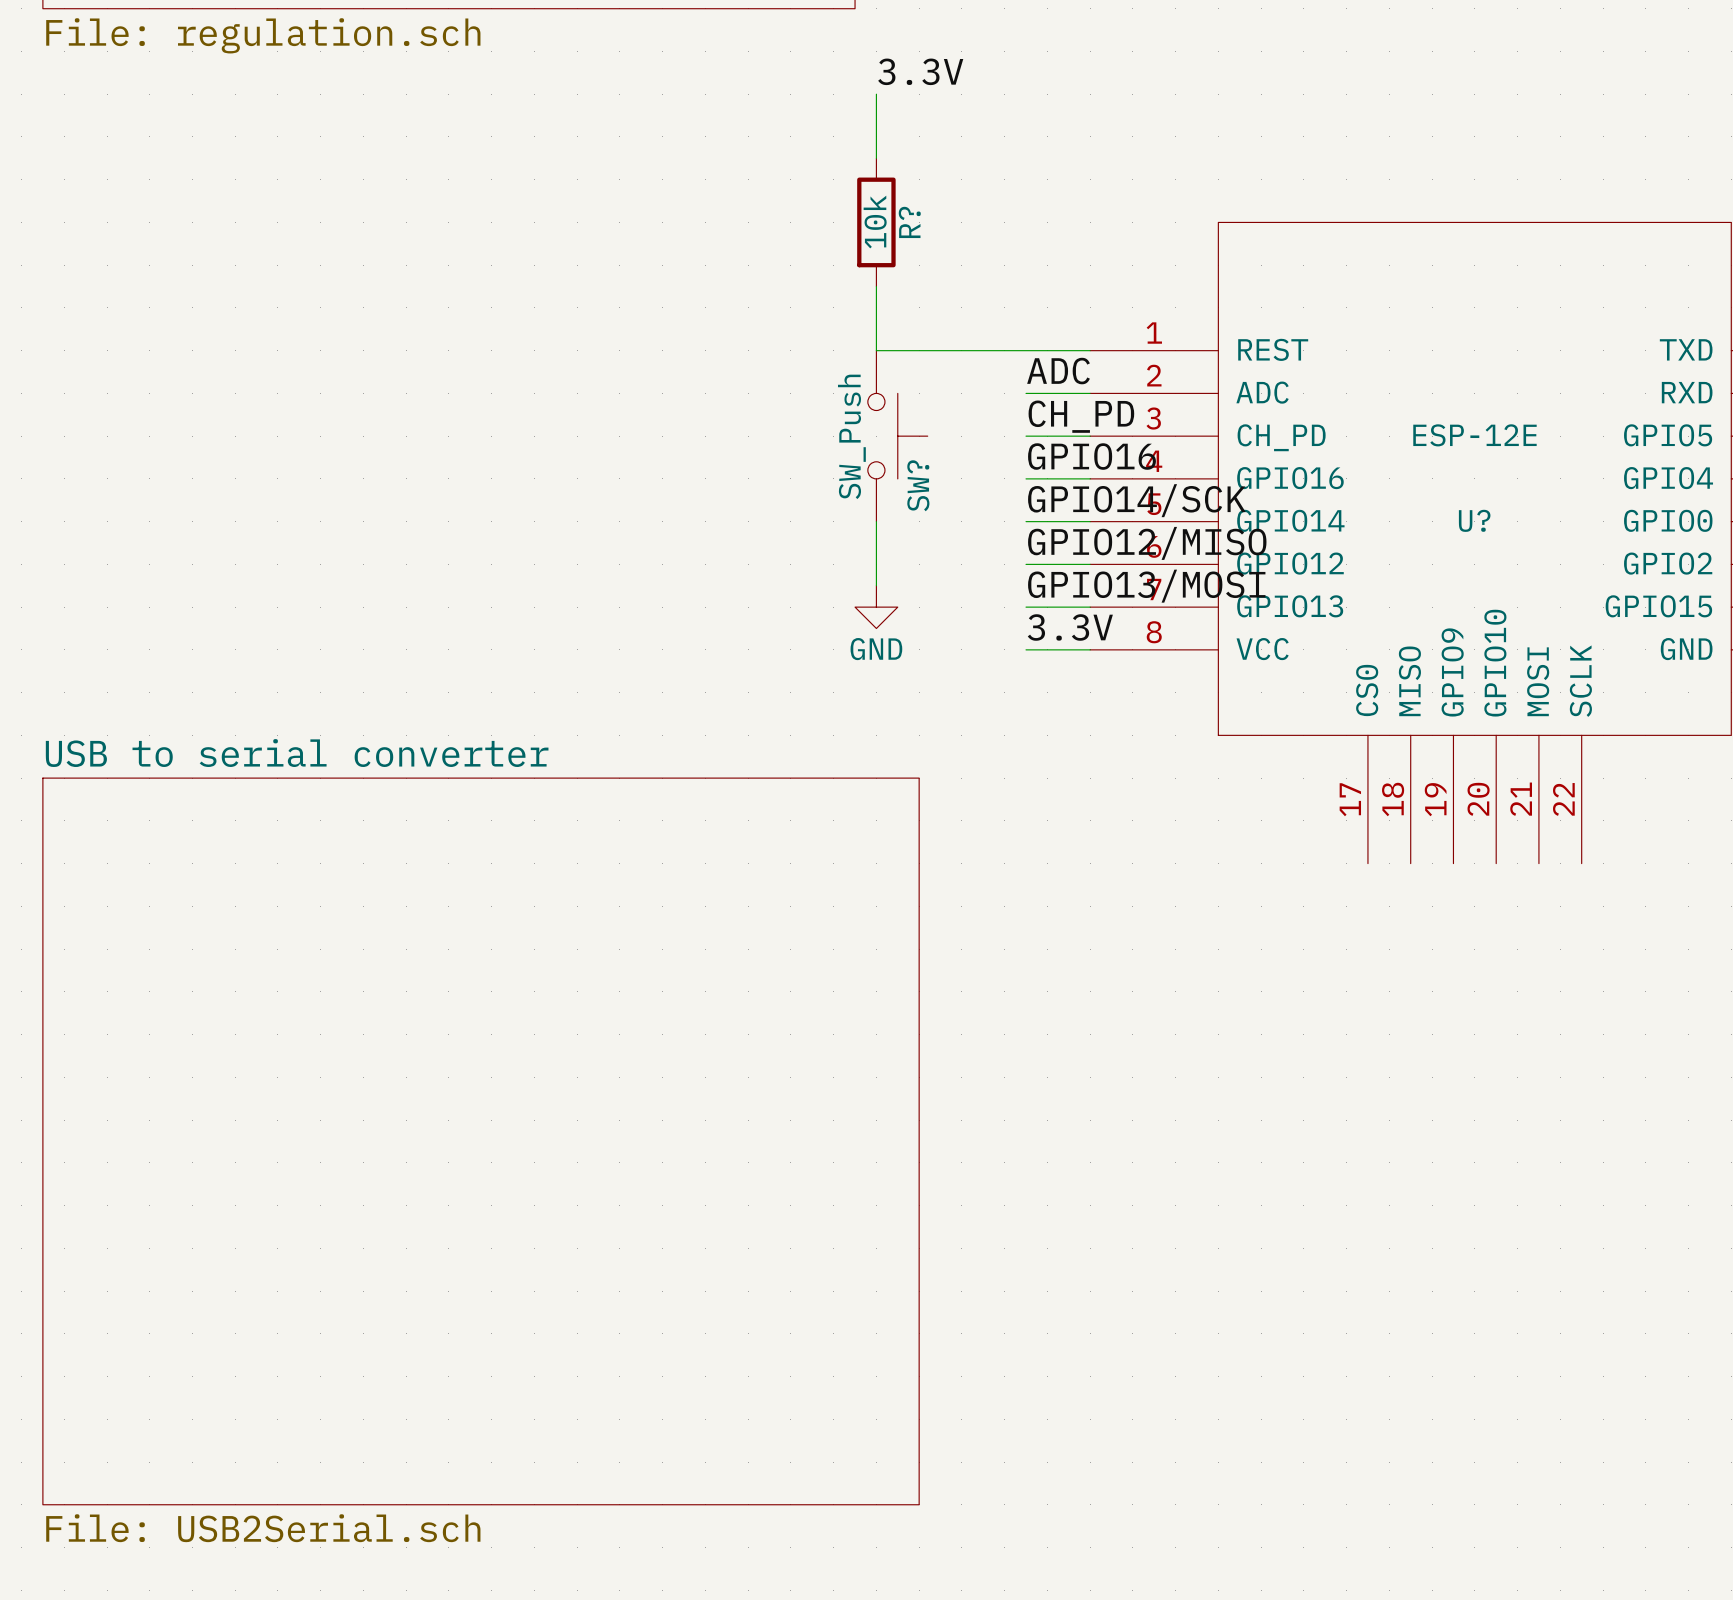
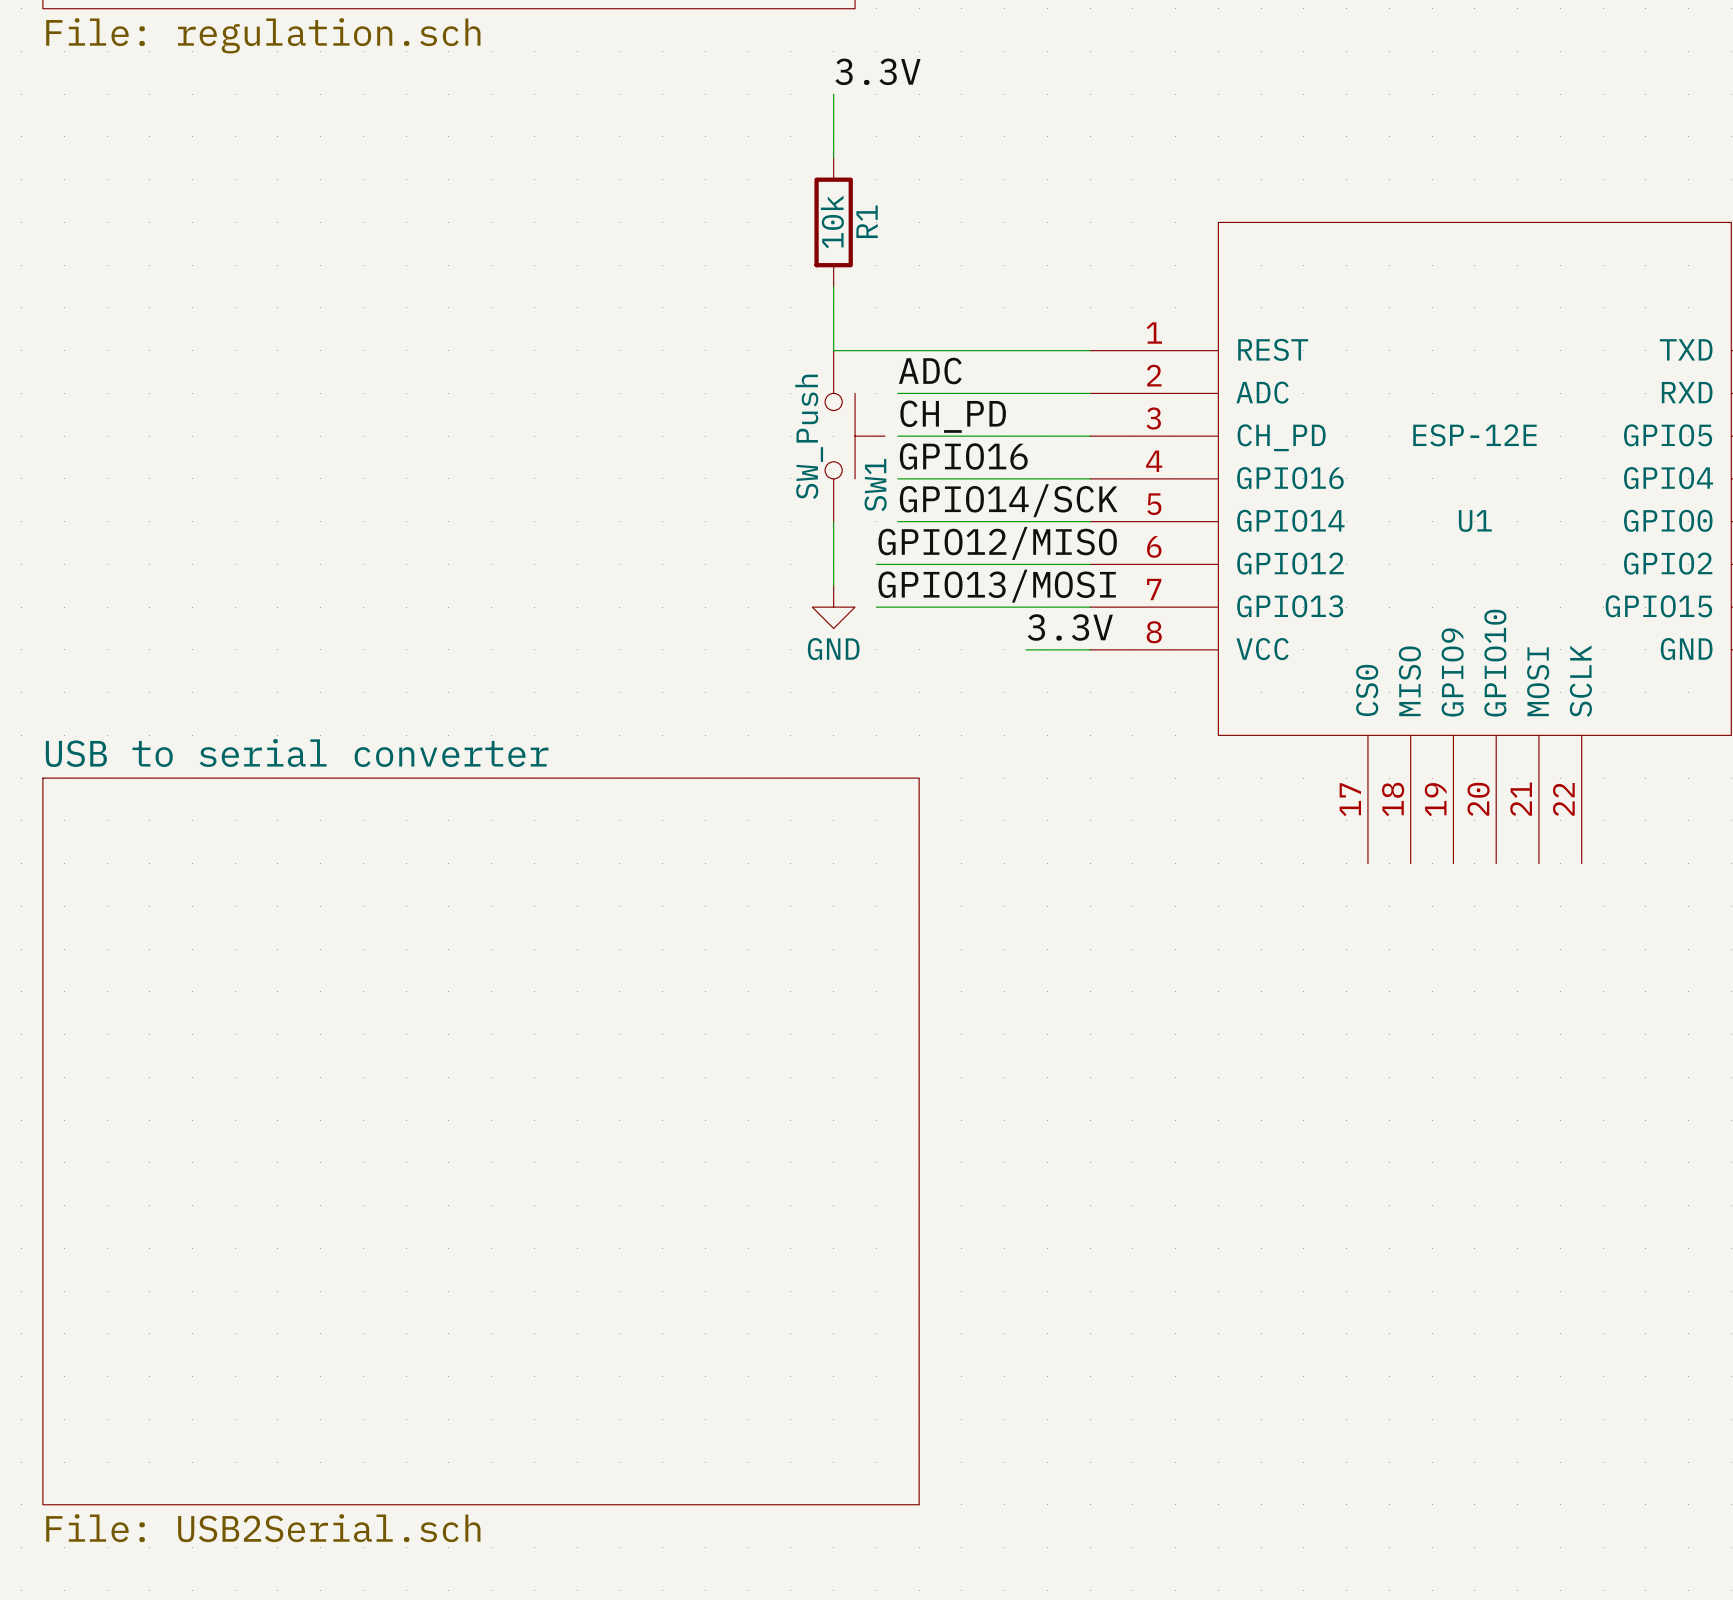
label position: 3.3V (920, 71) -> 3.3V (877, 71)
wire: (876, 94) (876, 158) -> (833, 94) (833, 158)
R1: none -> 10k (833, 222)
R?: 10k (876, 222) -> none
wire: (876, 286) (876, 350) -> (833, 286) (833, 350) (876, 350)
label position: ADC (1058, 371) -> ADC (930, 371)
wire: none -> (897, 393) (1026, 393)
label position: CH_PD (1081, 416) -> CH_PD (953, 416)
SW1: none -> SW_Push (855, 436)
wire: none -> (897, 436) (1026, 436)
SW?: SW_Push (897, 436) -> none
label position: GPIO16 (1092, 456) -> GPIO16 (963, 456)
wire: none -> (897, 478) (1026, 478)
label position: GPIO14/SCK (1136, 500) -> GPIO14/SCK (1008, 500)
U? name: U? (1474, 520) -> U1 (1475, 521)
wire: (876, 521) (876, 585) -> (833, 521) (833, 585)
wire: none -> (897, 521) (1026, 521)
label position: GPIO12/MISO (1147, 543) -> GPIO12/MISO (997, 543)
wire: none -> (876, 564) (1026, 564)
label position: GPIO13/MOSI (1146, 586) -> GPIO13/MOSI (997, 586)
wire: none -> (876, 607) (1026, 607)
power symbol position: GND (876, 607) -> GND (833, 607)

